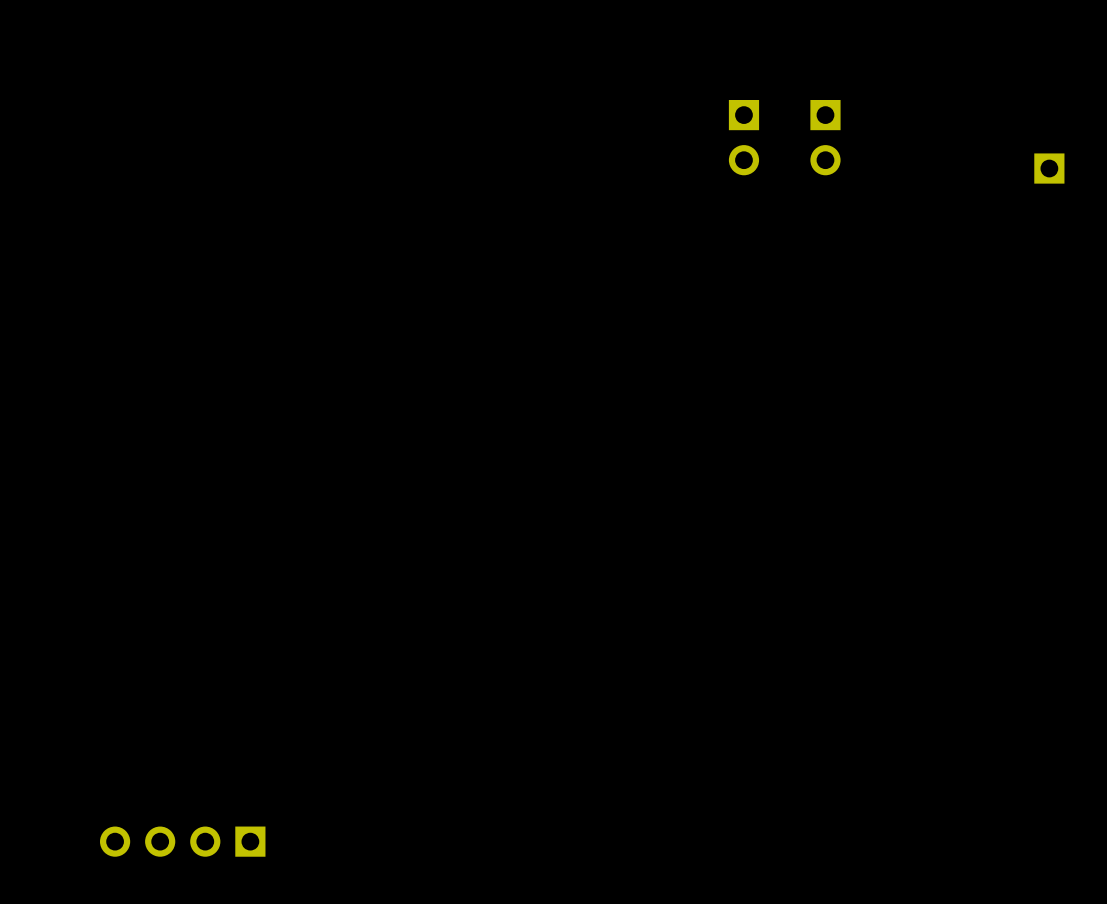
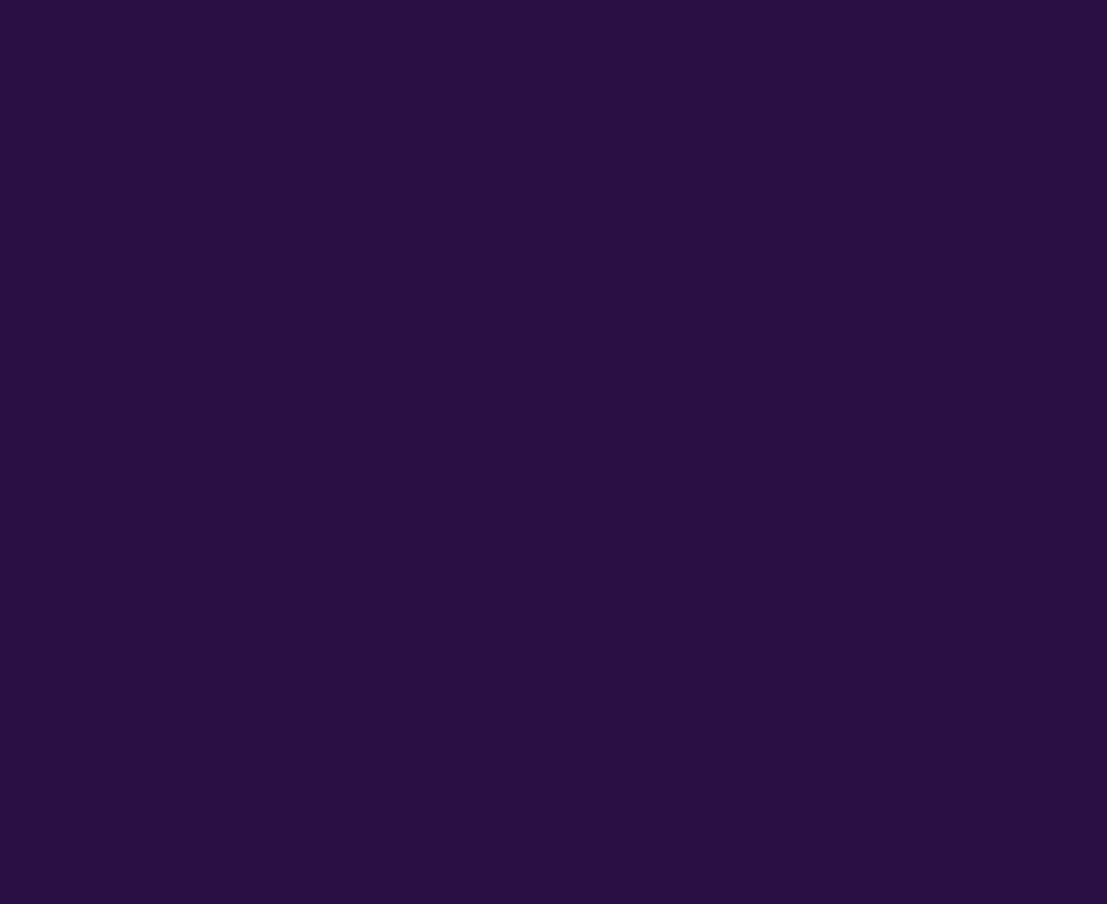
part: (743, 137) -> none
part: (825, 137) -> none
part: (1049, 168) -> none
part: (182, 841) -> none

